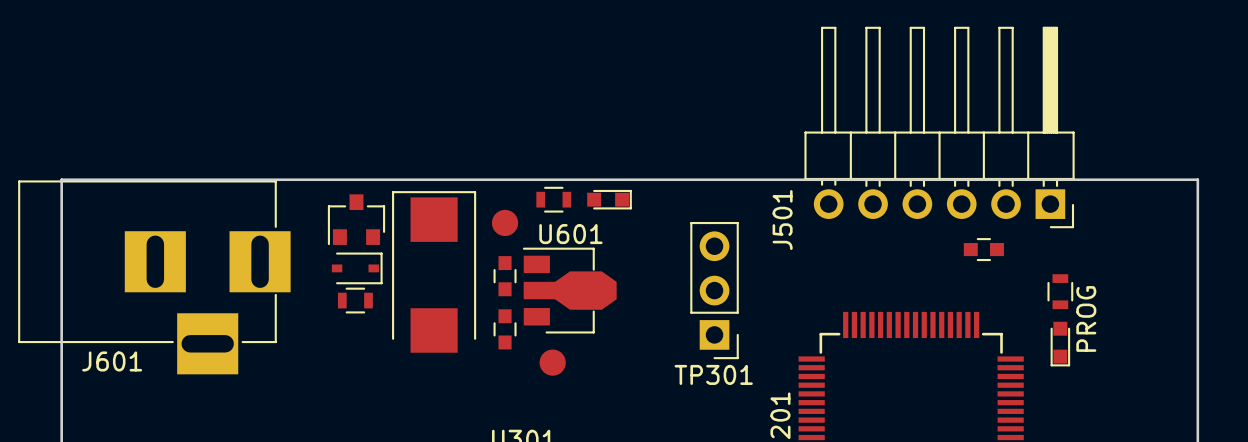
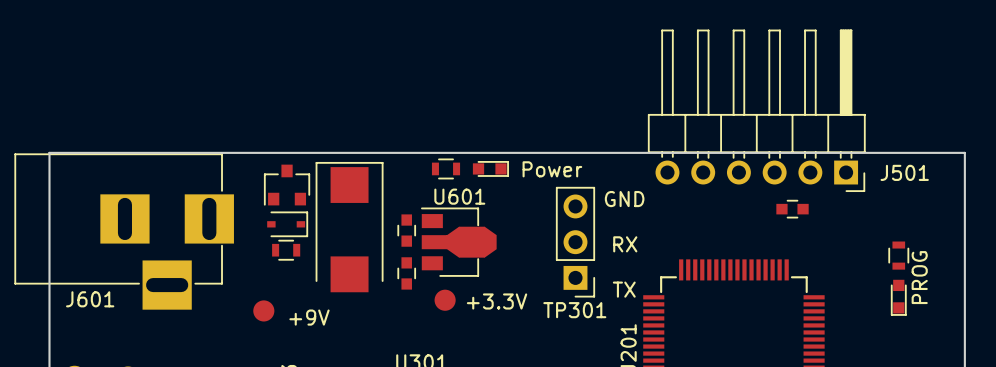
text: none -> Power (552, 169)
J501 name rotation: 0° (782, 220) -> 90° clockwise (904, 172)
J501 name position: J501 (782, 220) -> J501 (904, 172)
part position: (505, 222) -> (263, 310)
text: none -> GND (624, 199)
part position: (1060, 291) -> (898, 255)
text: none -> RX (625, 244)
text position: PROG (1086, 318) -> PROG (919, 277)
part position: (1060, 344) -> (898, 297)
text: none -> TX (624, 289)
text: none -> +3.3V (497, 301)
text: none -> +9V (309, 317)

